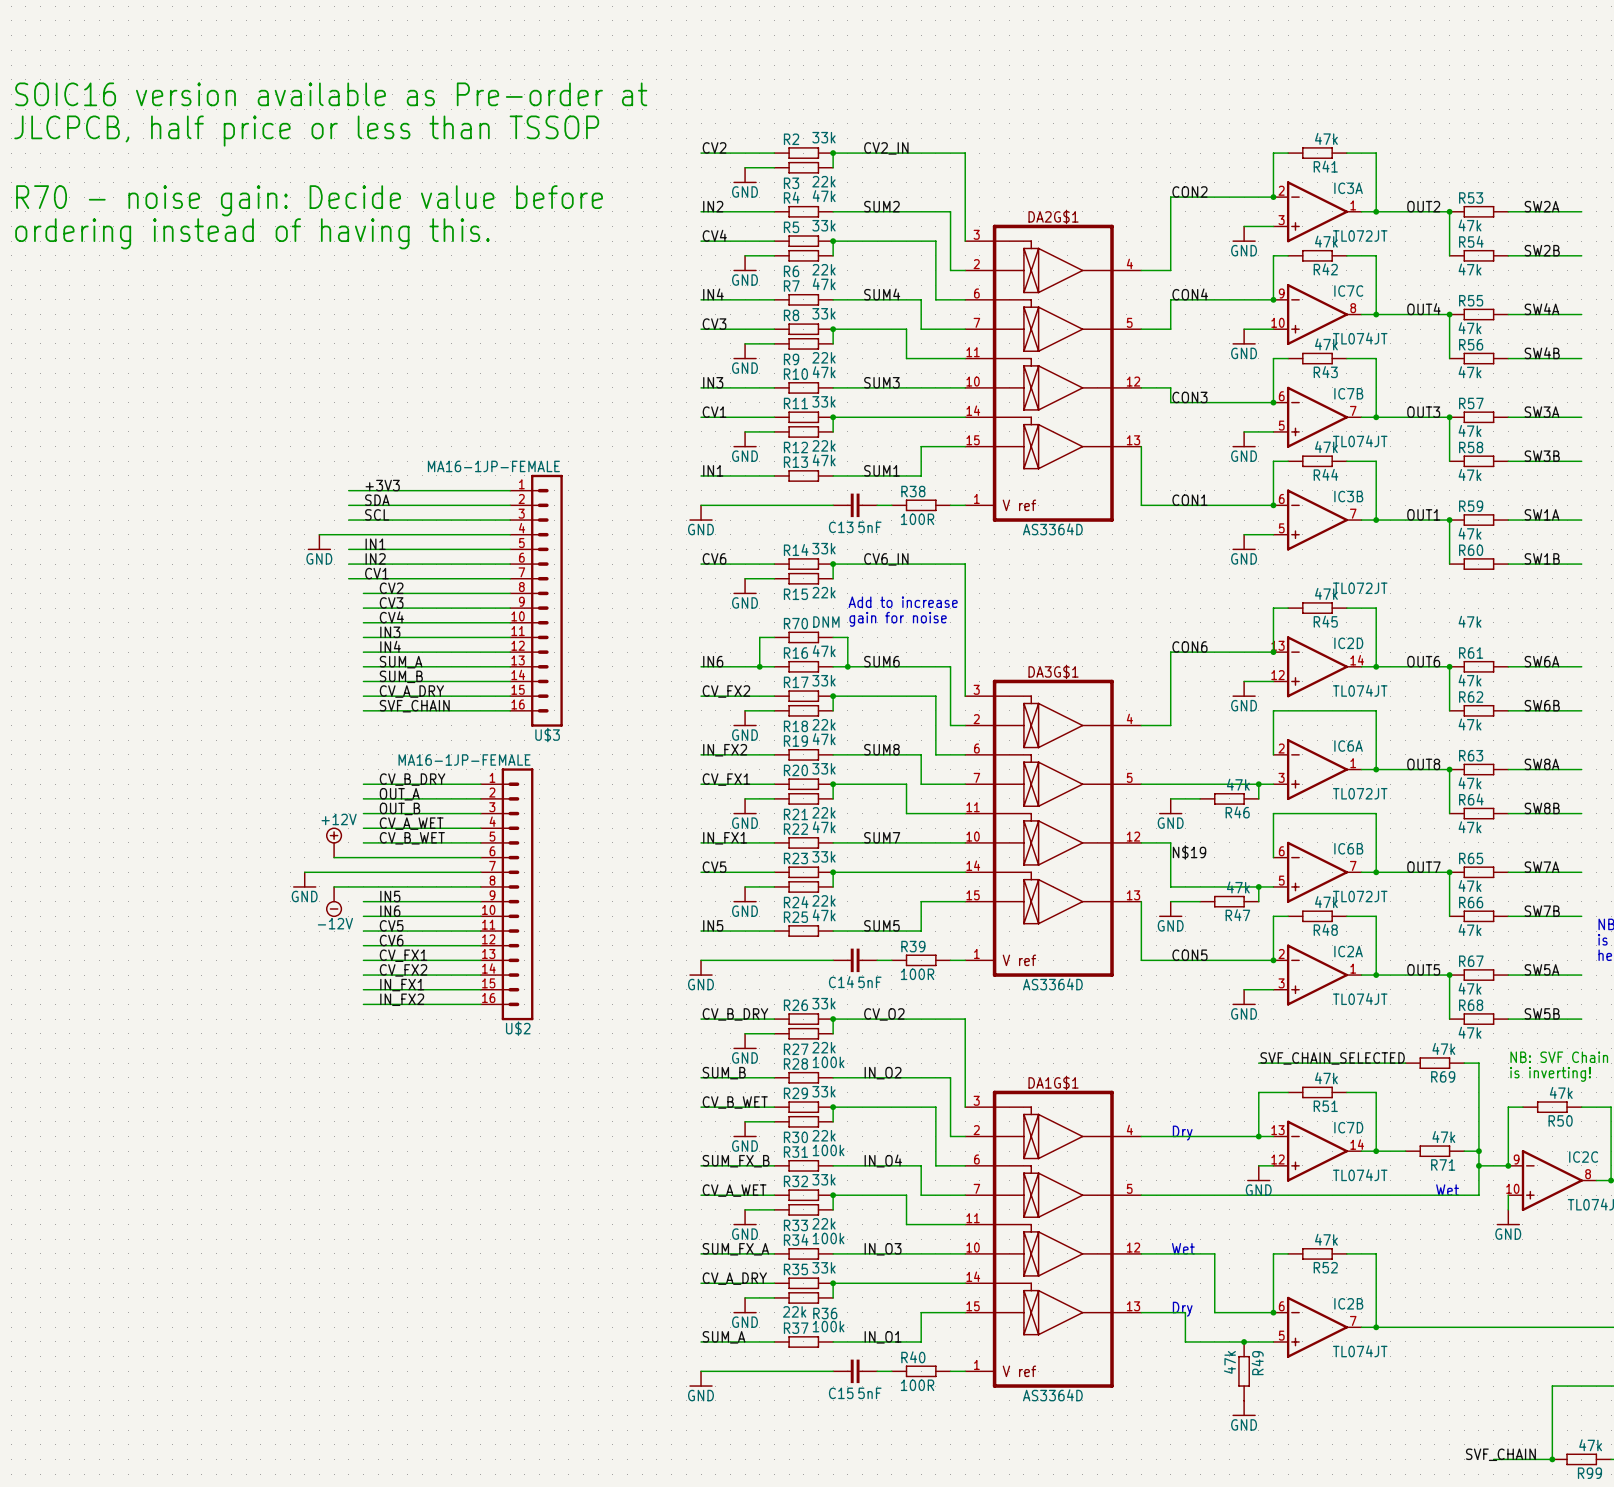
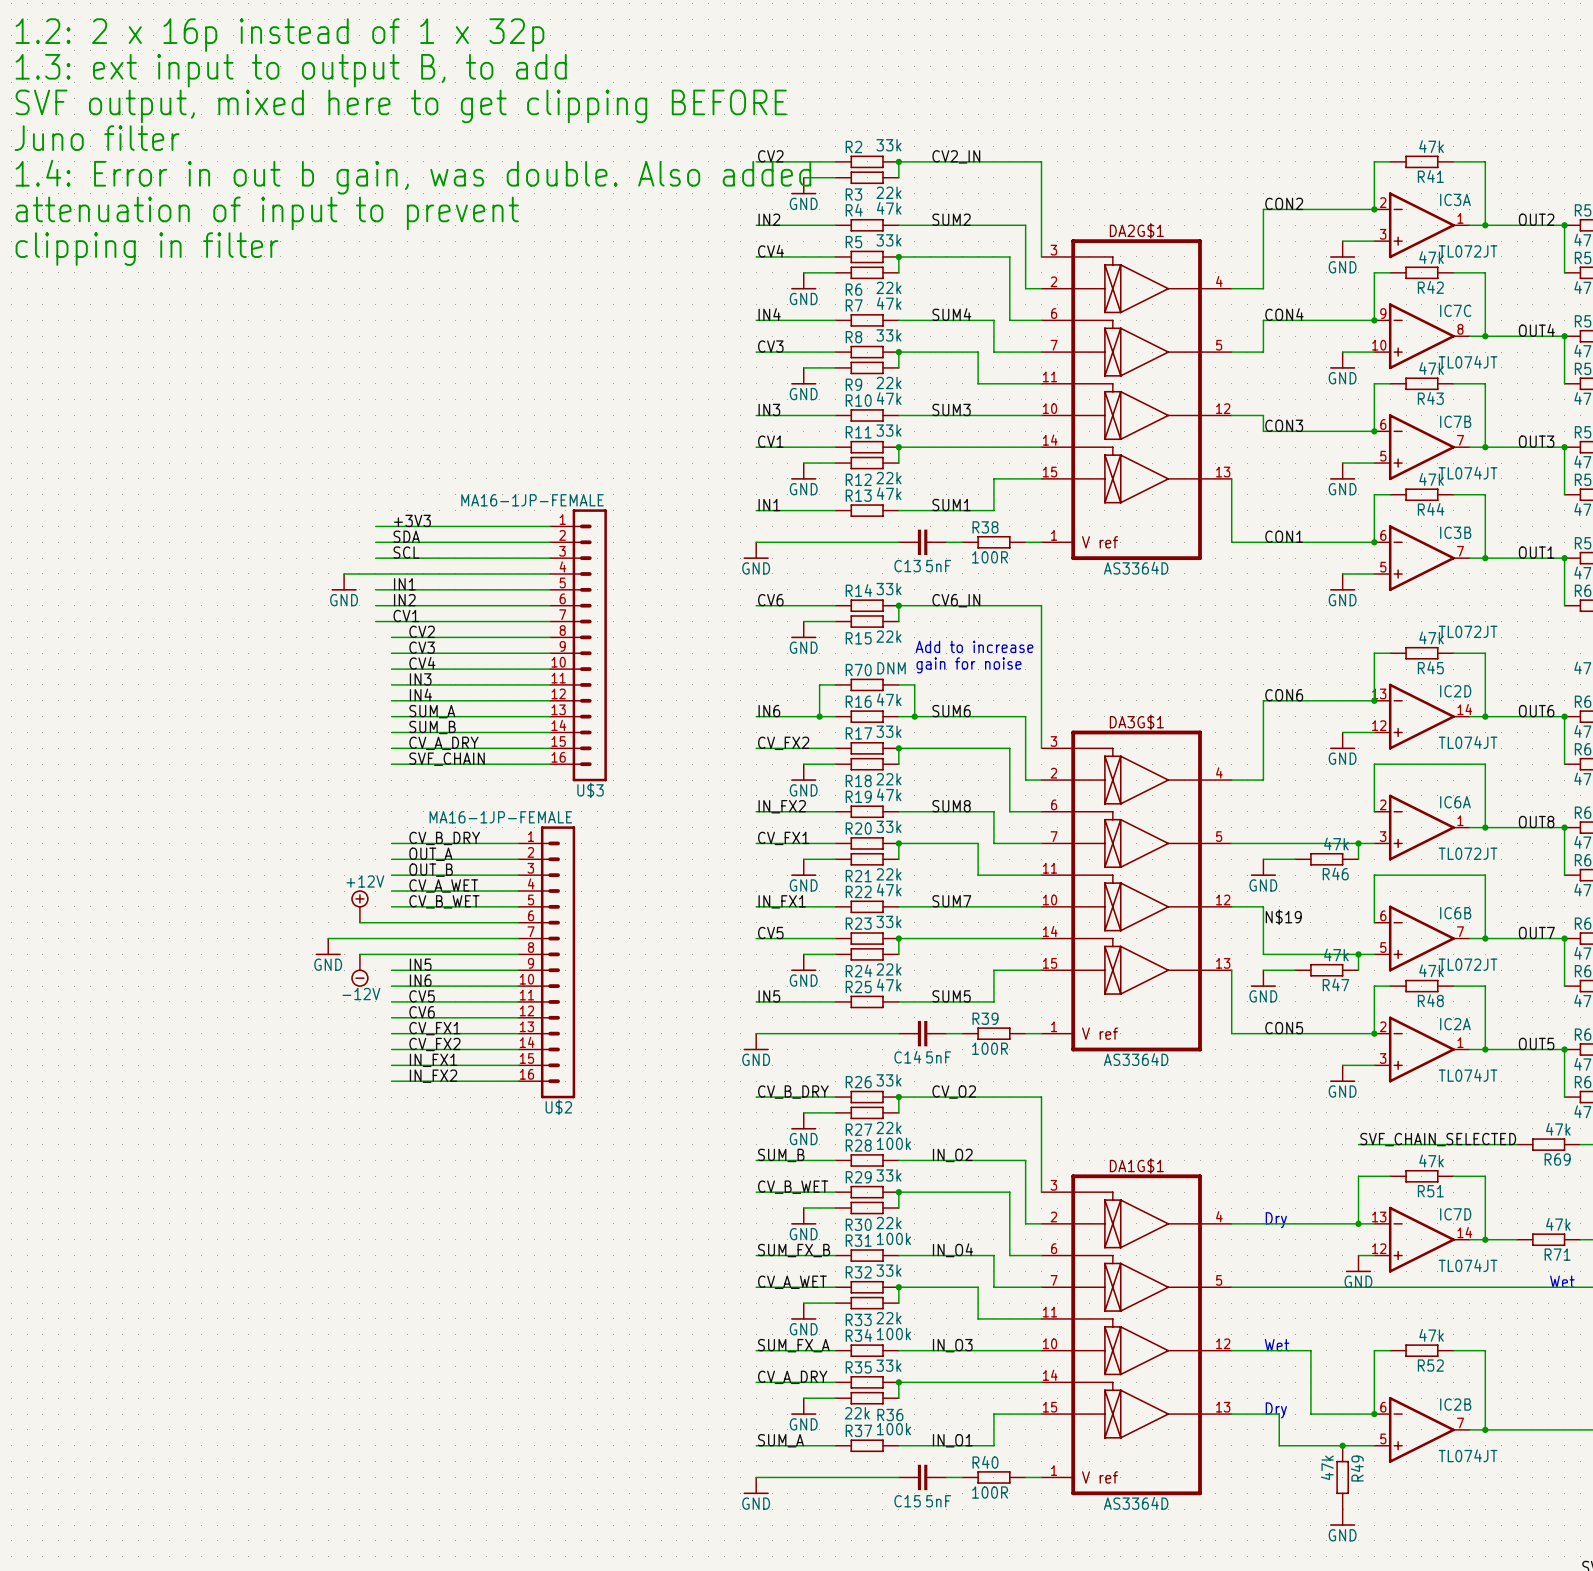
text: none -> 1.2: 2 x 16p instead of 1 x 32p (279, 35)
text: none -> 1.3: ext input to output B, to add (291, 70)
text: SOIC16 version available as Pre-order at (331, 94) -> SVF output, mixed here to get clipping BEFORE (401, 106)
text: JLCPCB, half price or less than TSSOP (306, 131) -> Juno filter (97, 138)
text: none -> 1.4: Error in out b gain, was double. Also added (413, 177)
text: R70 - noise gain: Decide value before (309, 200) -> attenuation of input to prevent (267, 213)
text: ordering instead of having this. (252, 233) -> clipping in filter (146, 249)

